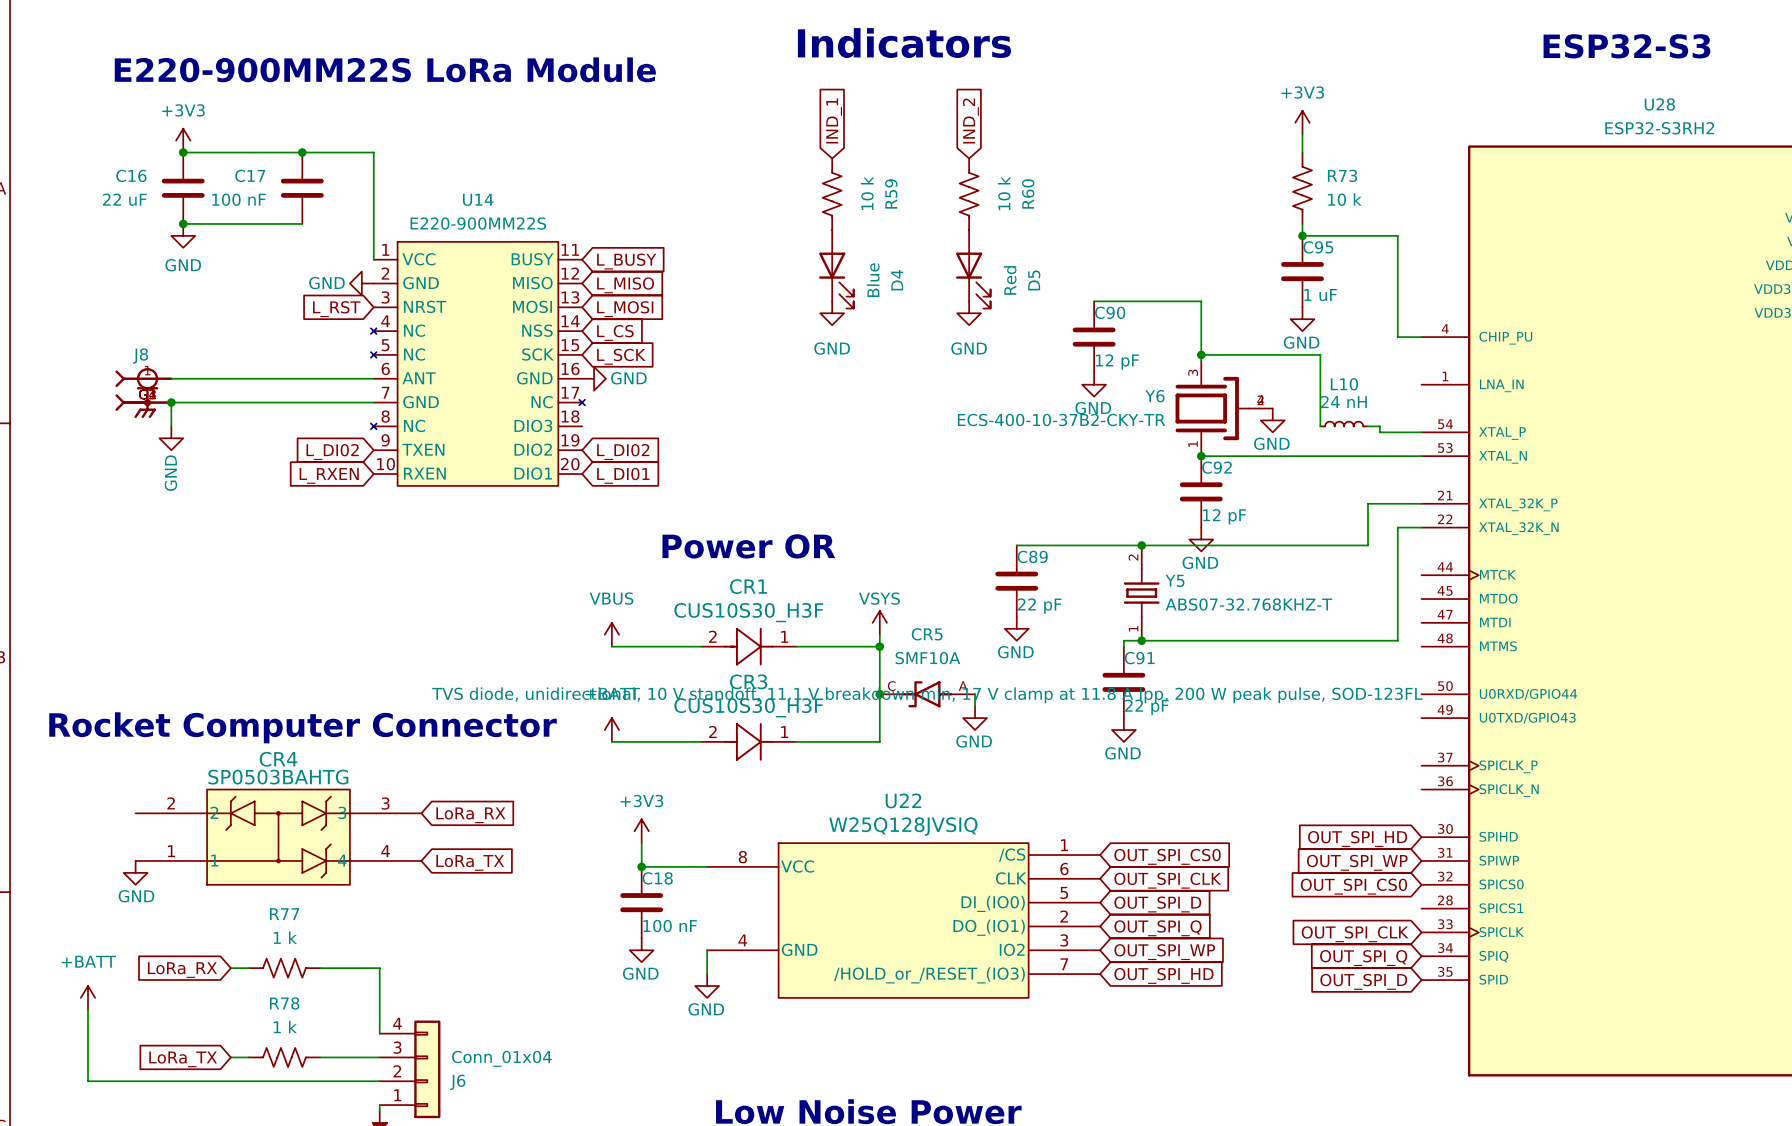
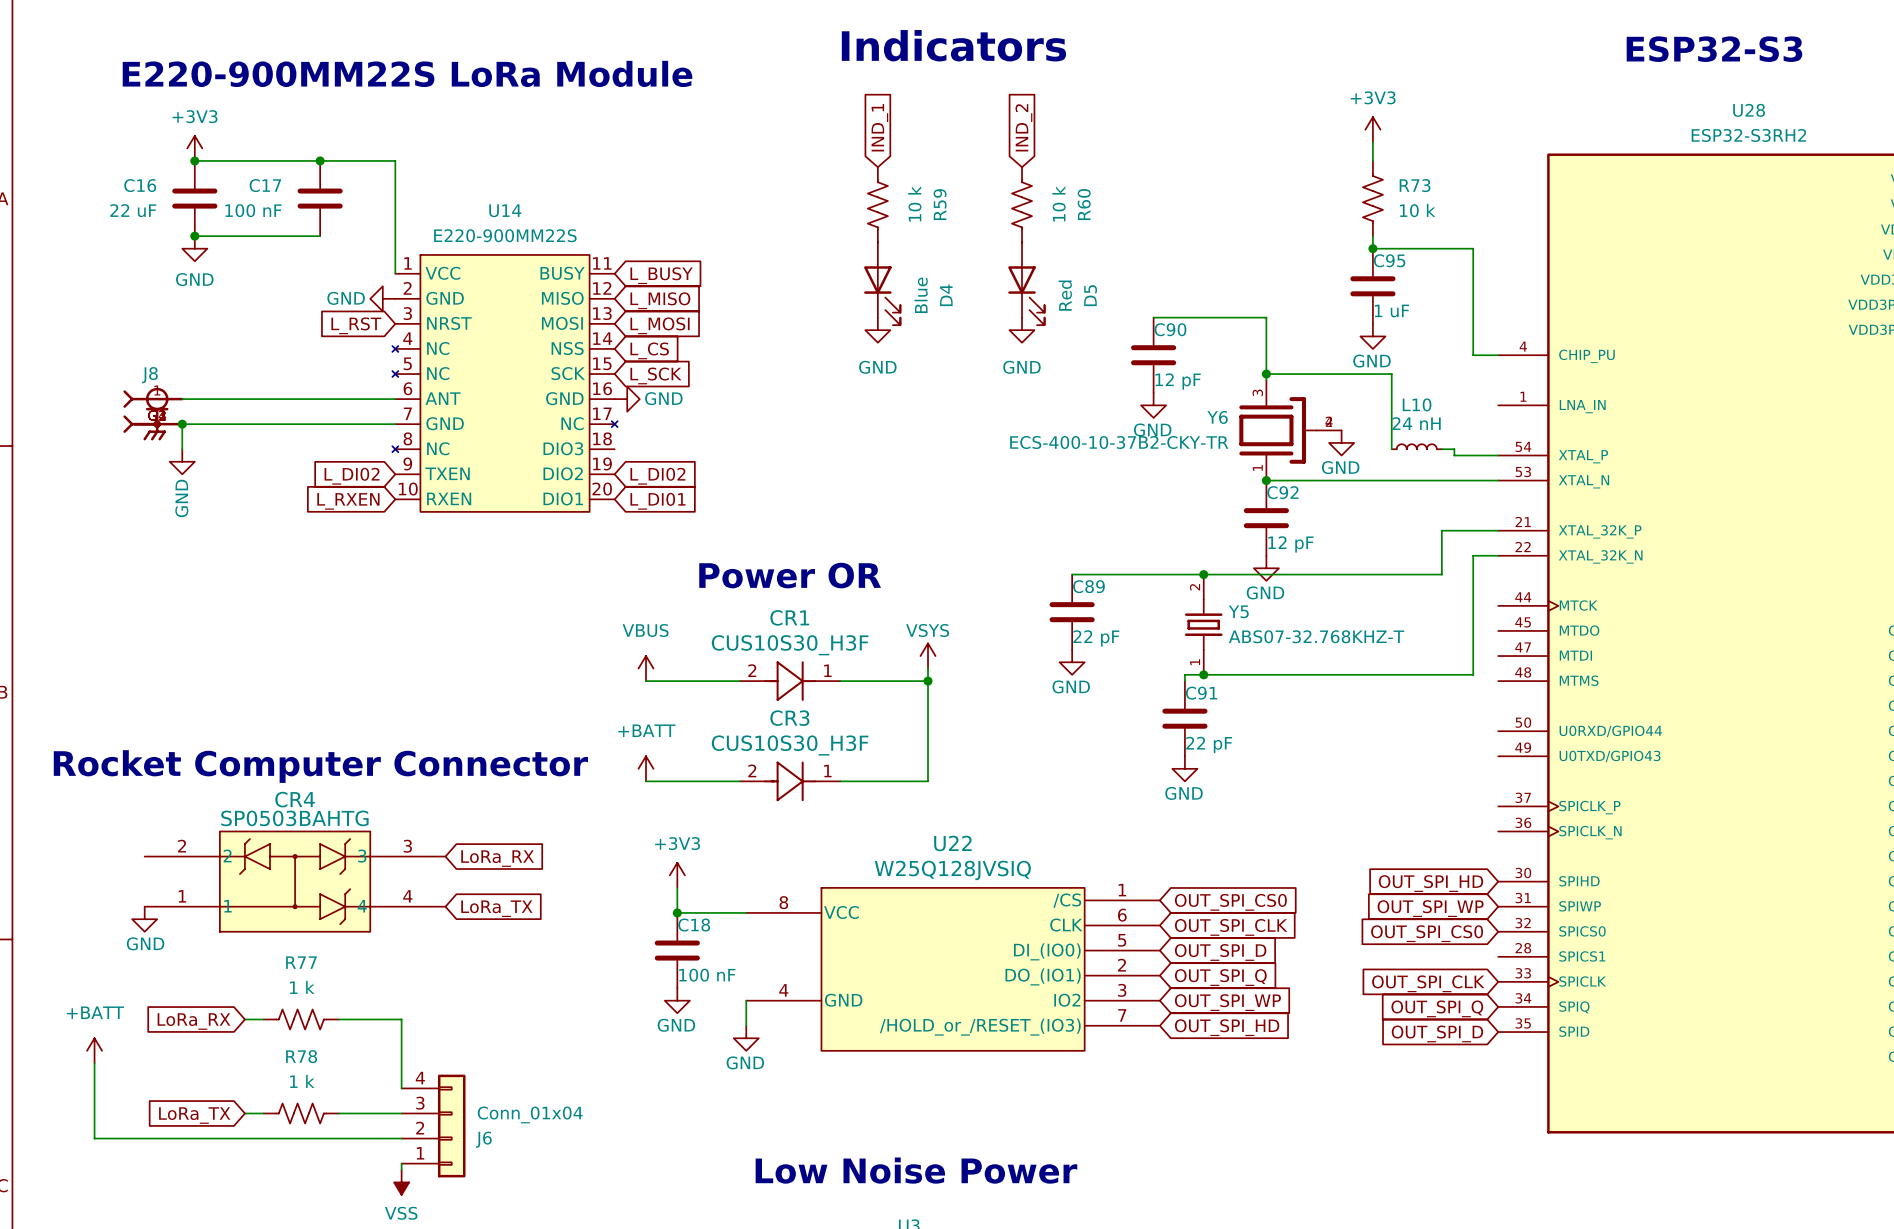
junction: (879, 694) -> none
CR5: SMF10A (927, 694) -> none
wire: (975, 694) (975, 706) -> none
power symbol: GND (975, 718) -> none

